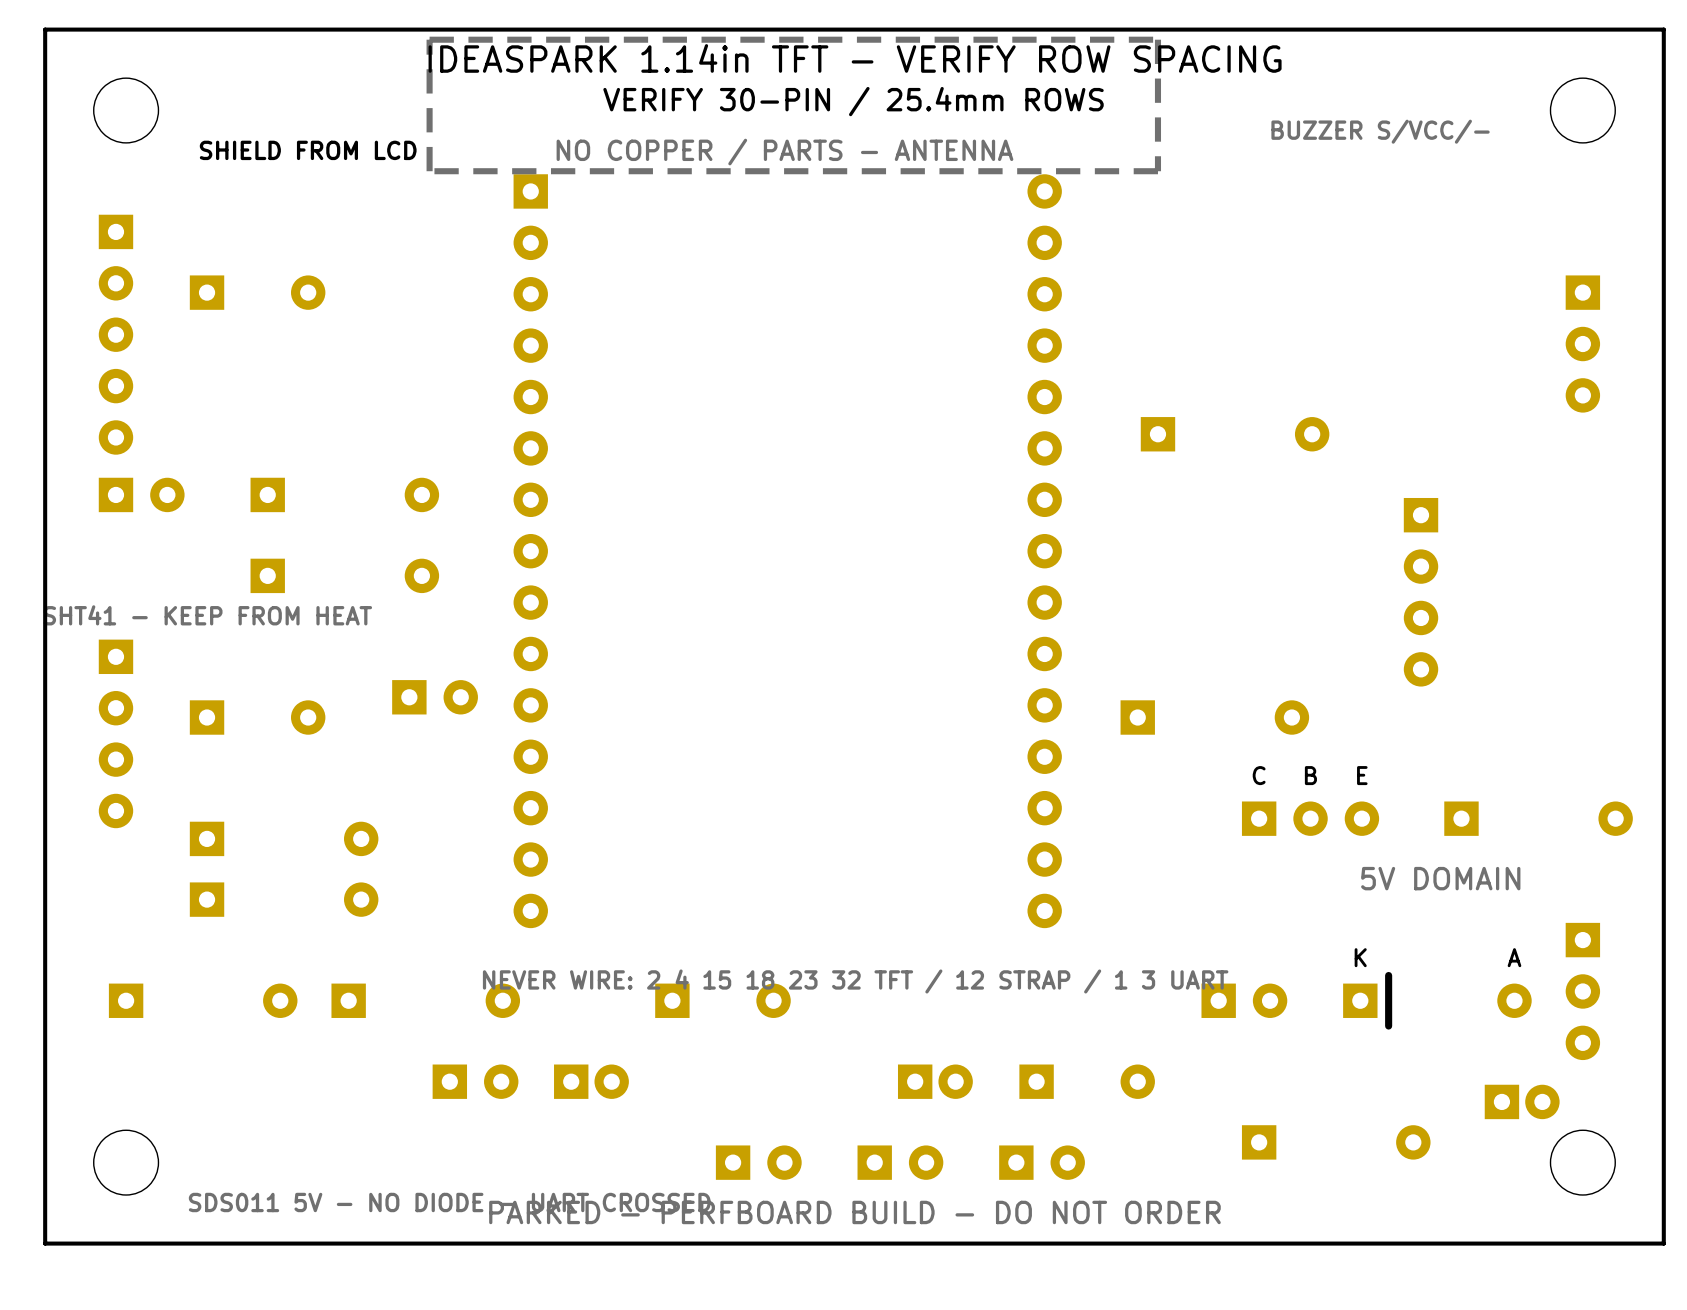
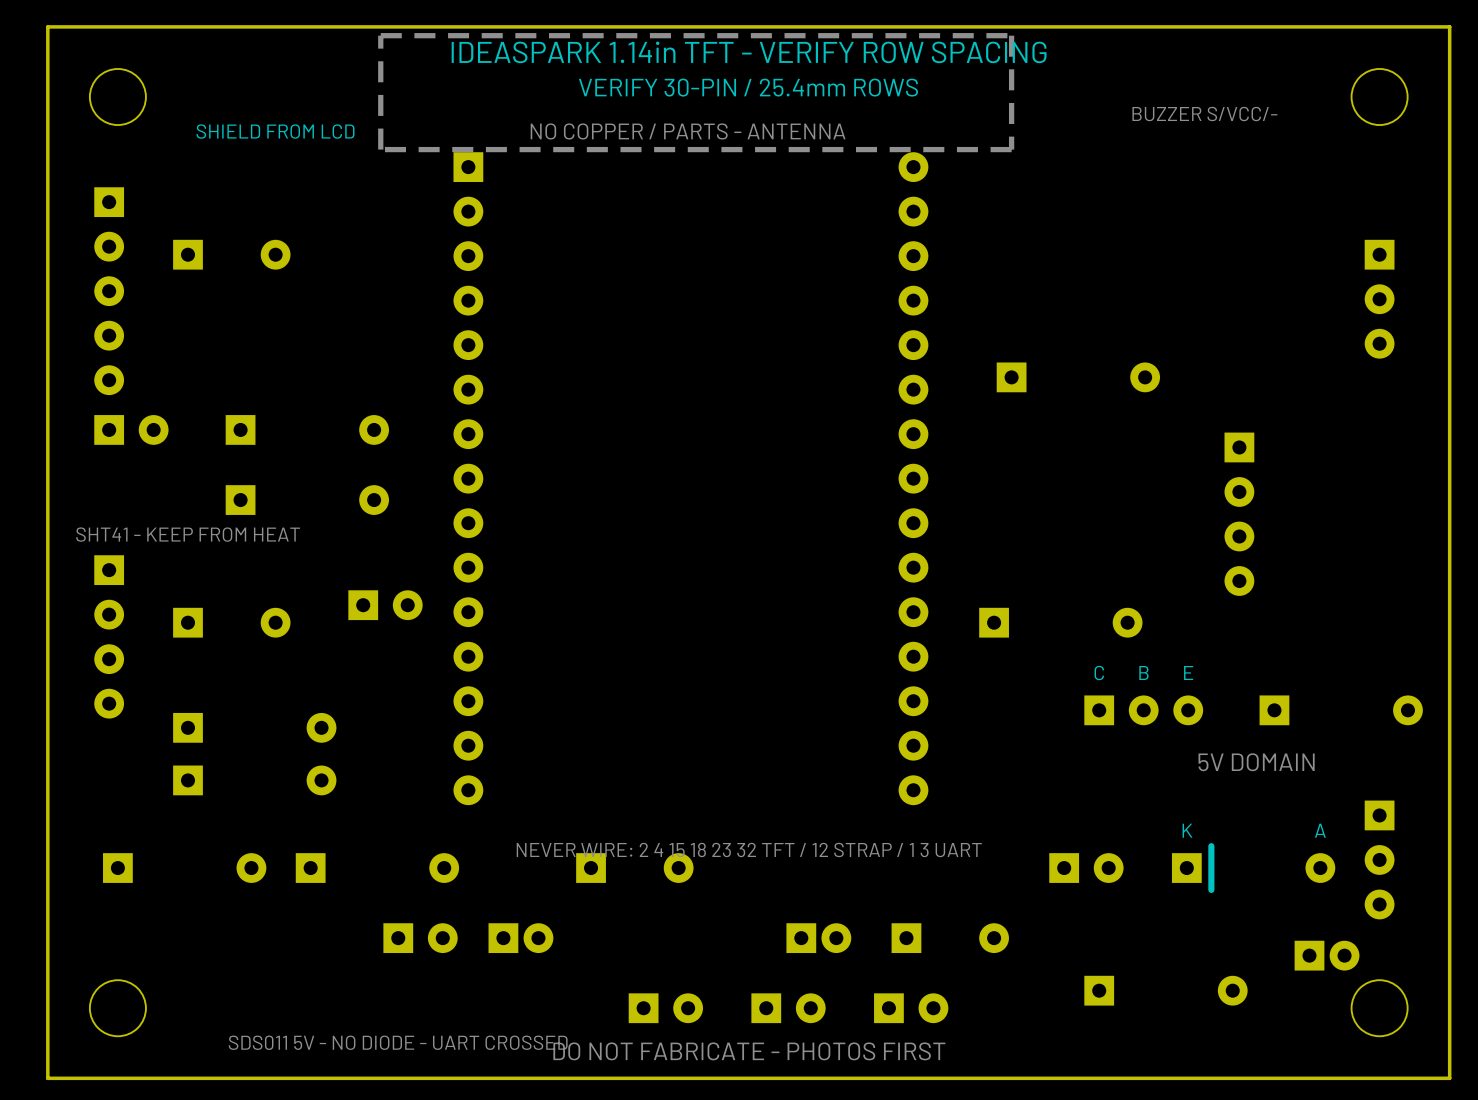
text: PARKED - PERFBOARD BUILD - DO NOT ORDER (854, 1212) -> DO NOT FABRICATE - PHOTOS FIRST (749, 1051)

